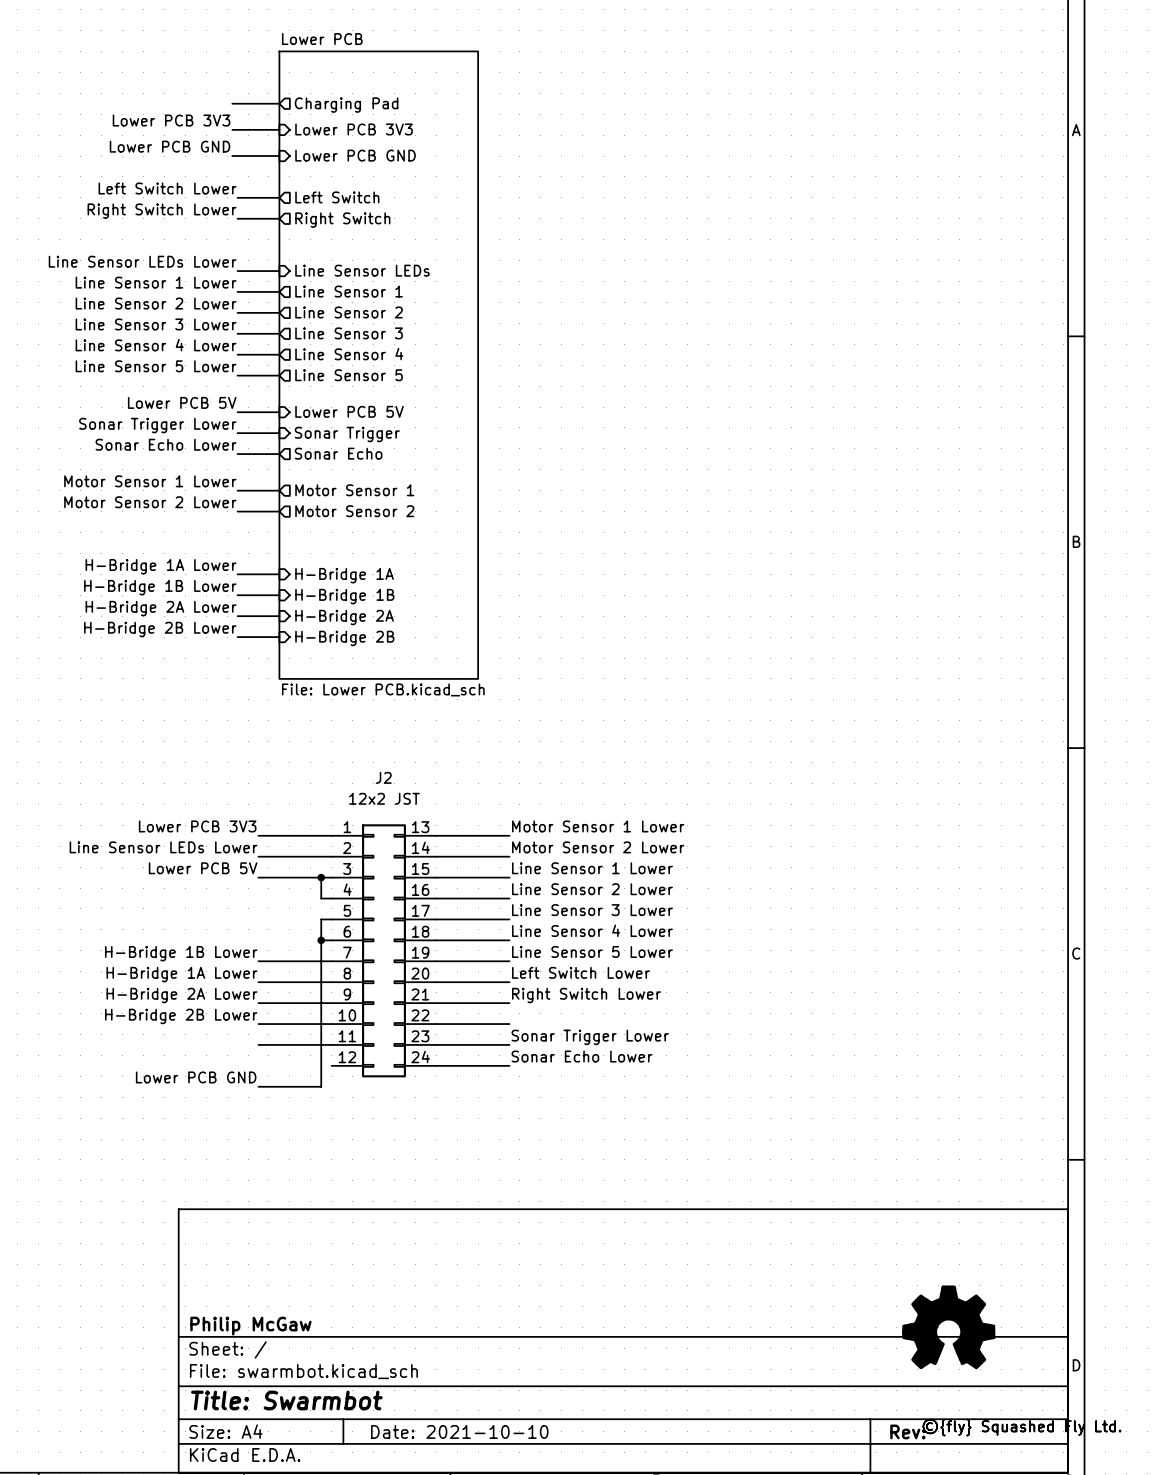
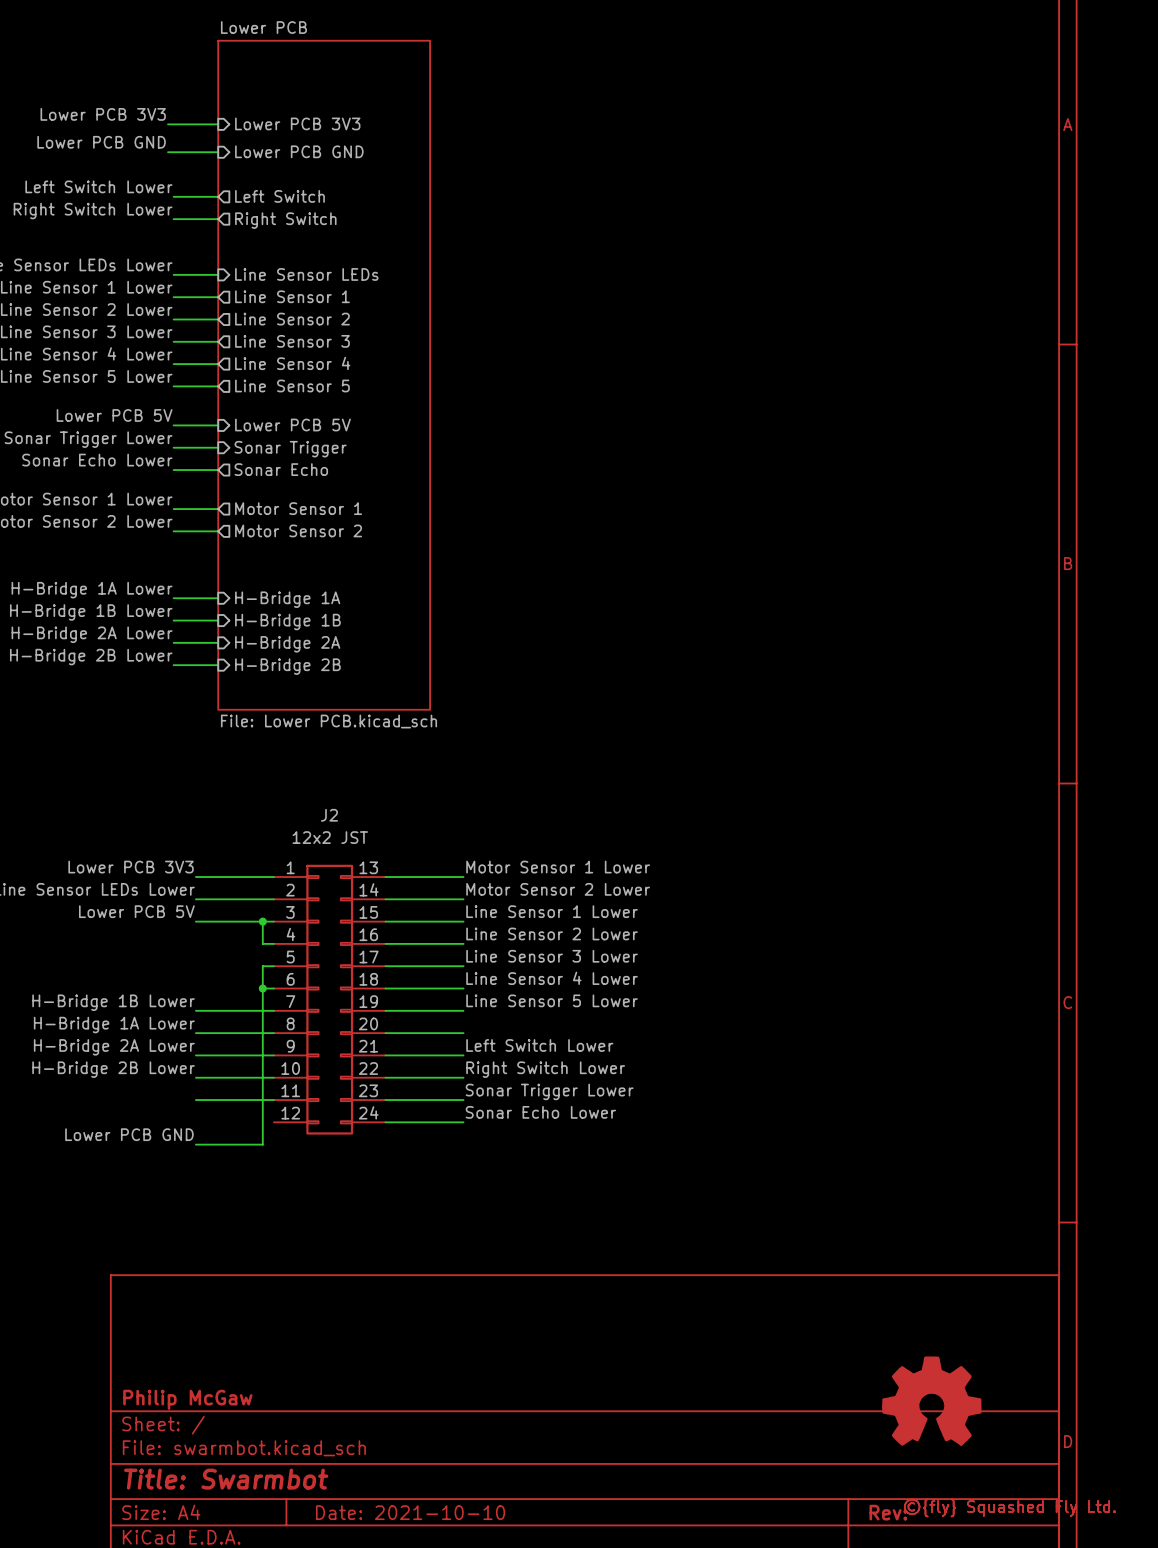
wire: (232, 103) (279, 103) -> none
sheet pin: Charging Pad (346, 105) -> none
label: Left Switch Lower (581, 972) -> none
label: Right Switch Lower (586, 995) -> Left Switch Lower (539, 1045)
label: none -> Right Switch Lower (545, 1069)

